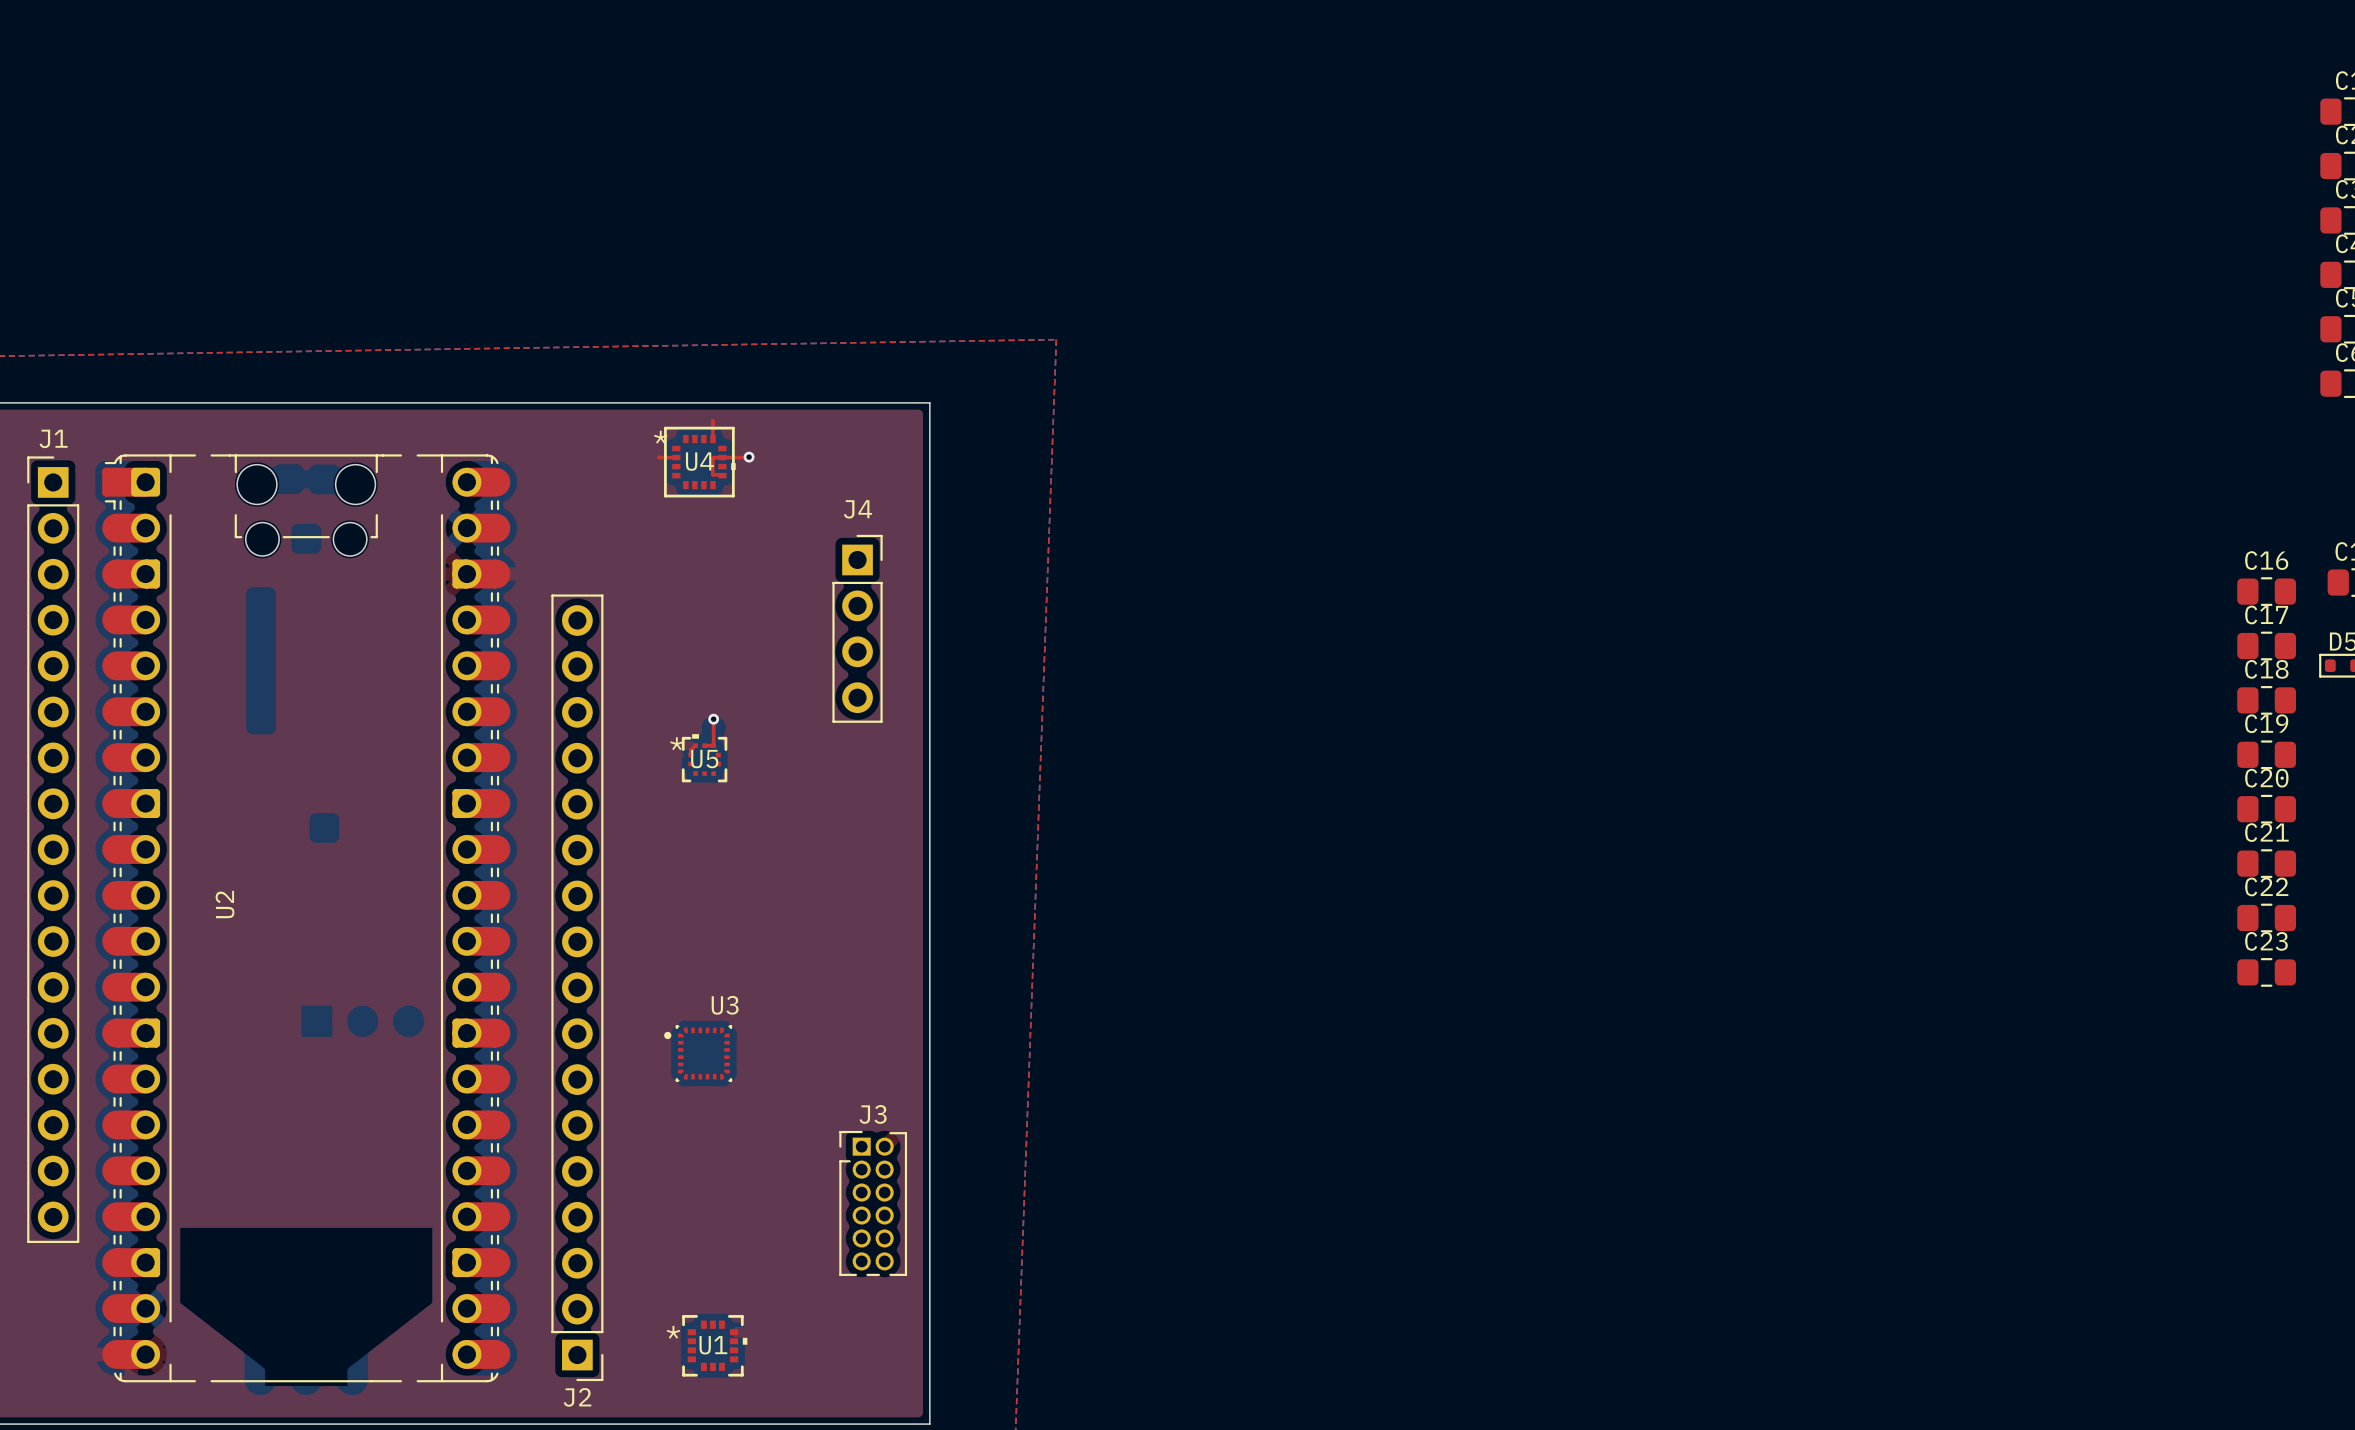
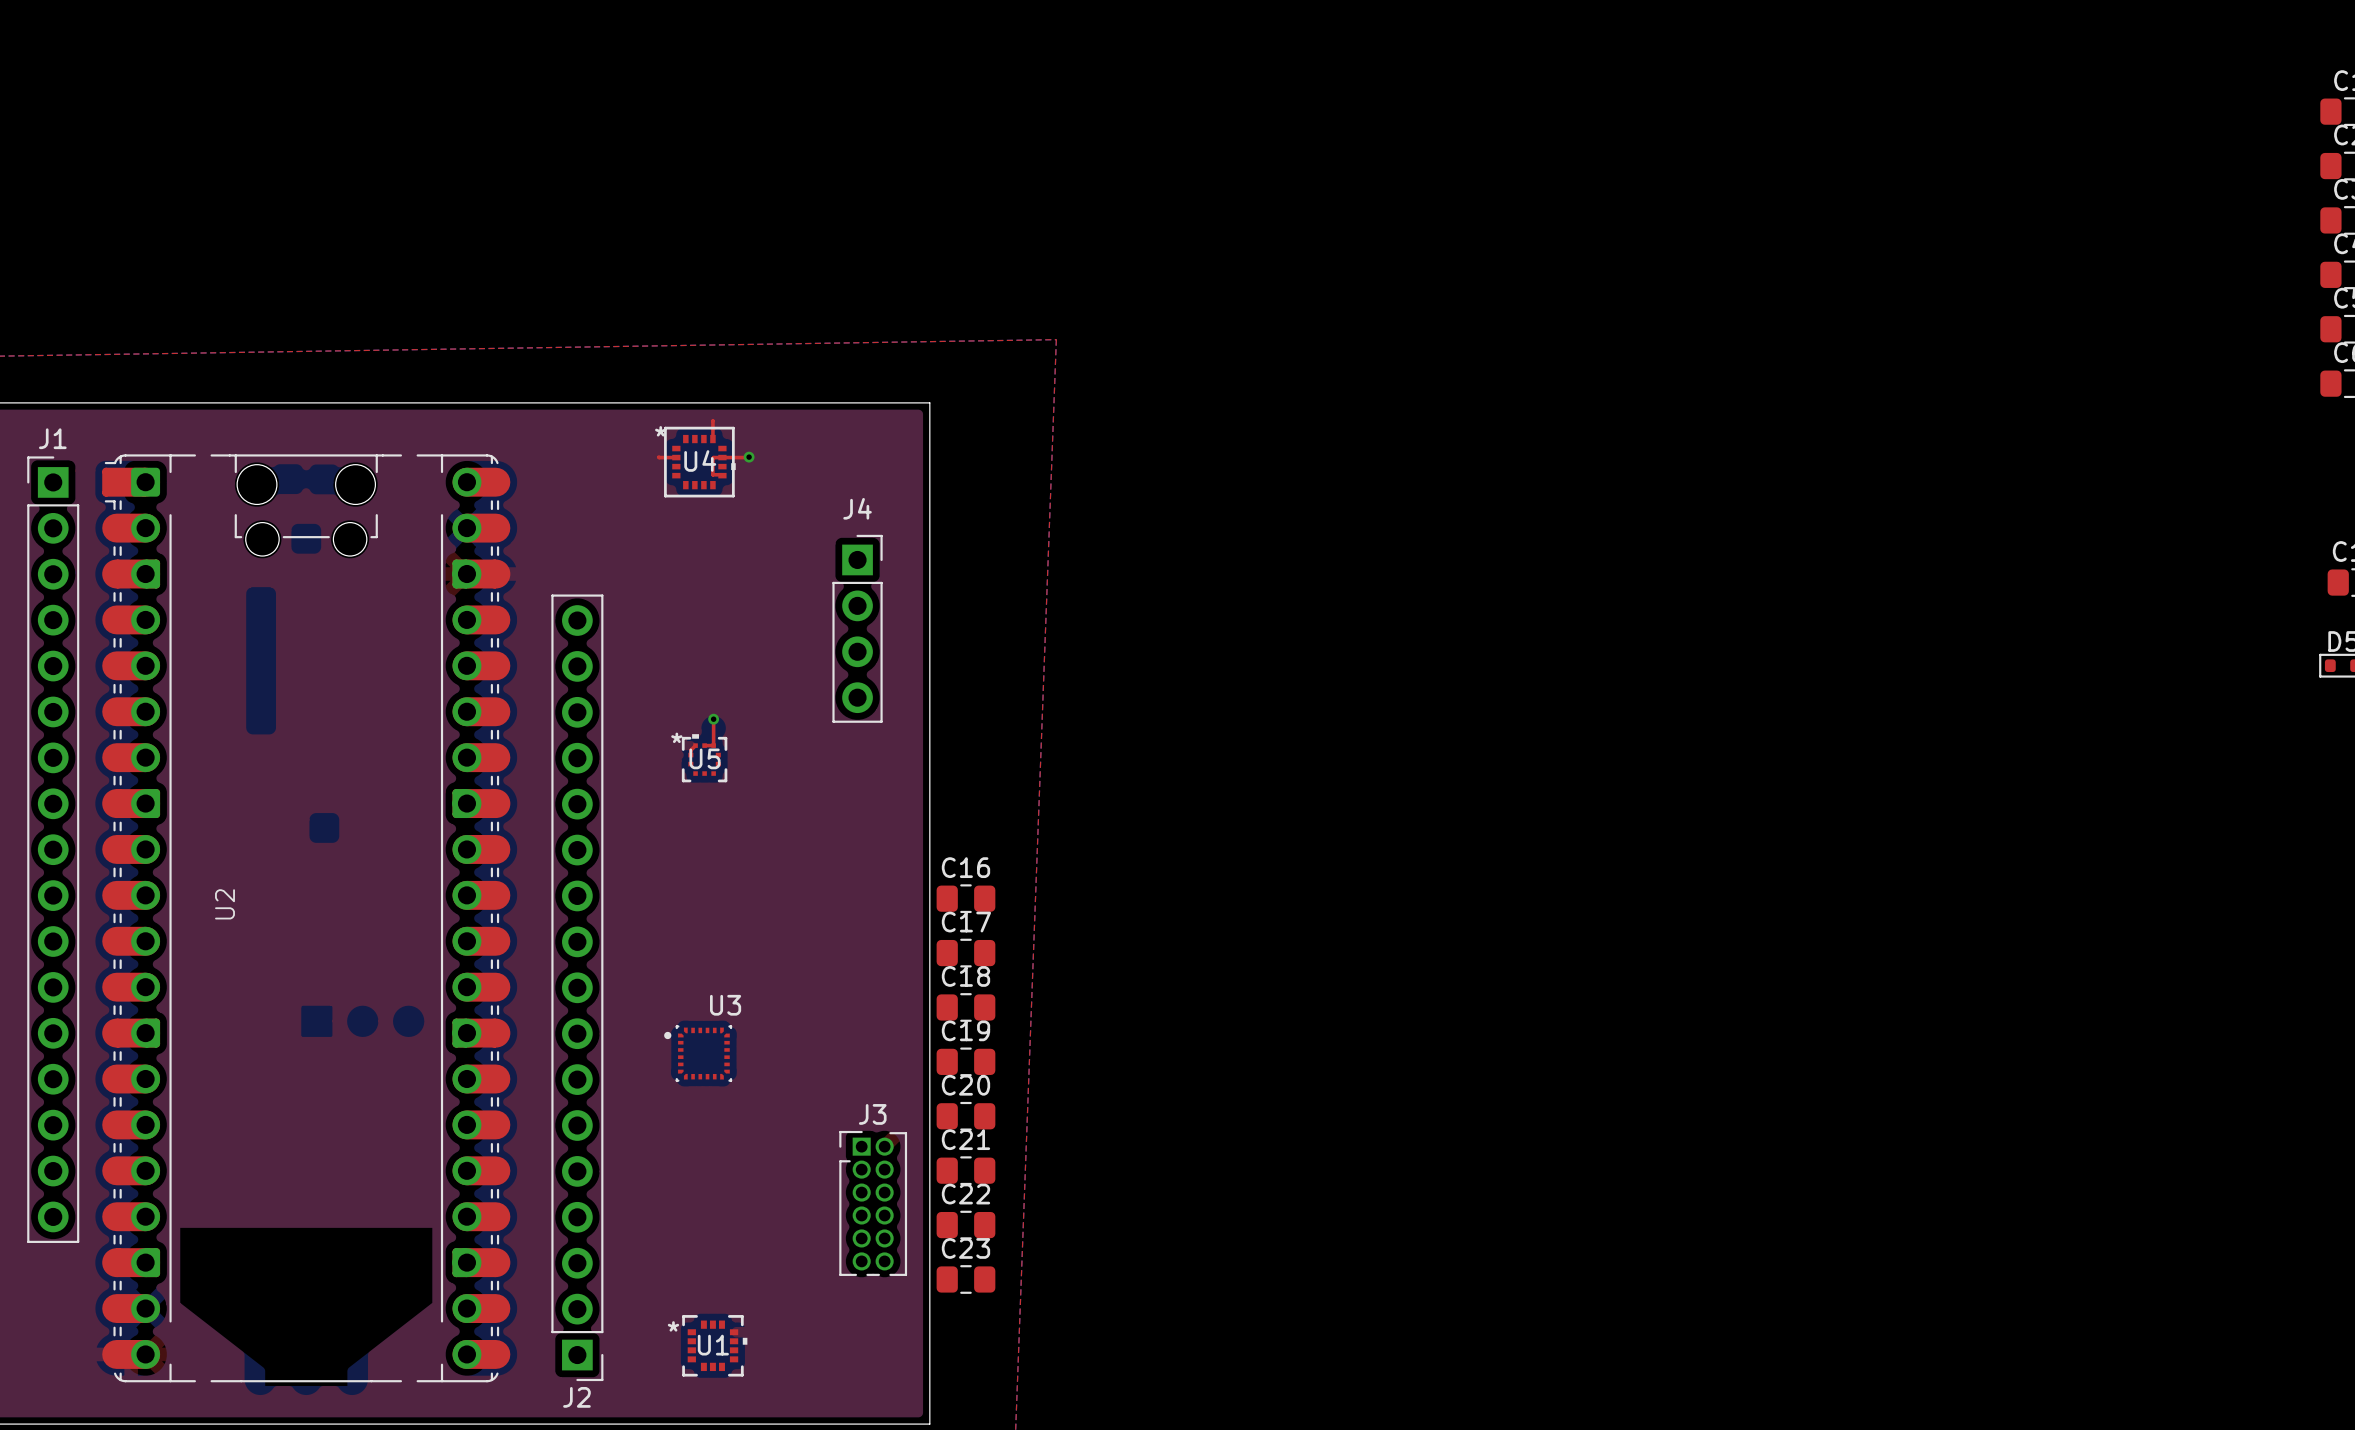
C16 position: (2266, 591) -> (965, 898)
C17 position: (2266, 645) -> (965, 953)
C18 position: (2266, 700) -> (965, 1007)
C19 position: (2266, 754) -> (965, 1061)
C20 position: (2266, 809) -> (965, 1116)
C21 position: (2266, 863) -> (965, 1170)
C22 position: (2266, 918) -> (965, 1225)
C23 position: (2266, 972) -> (965, 1279)

